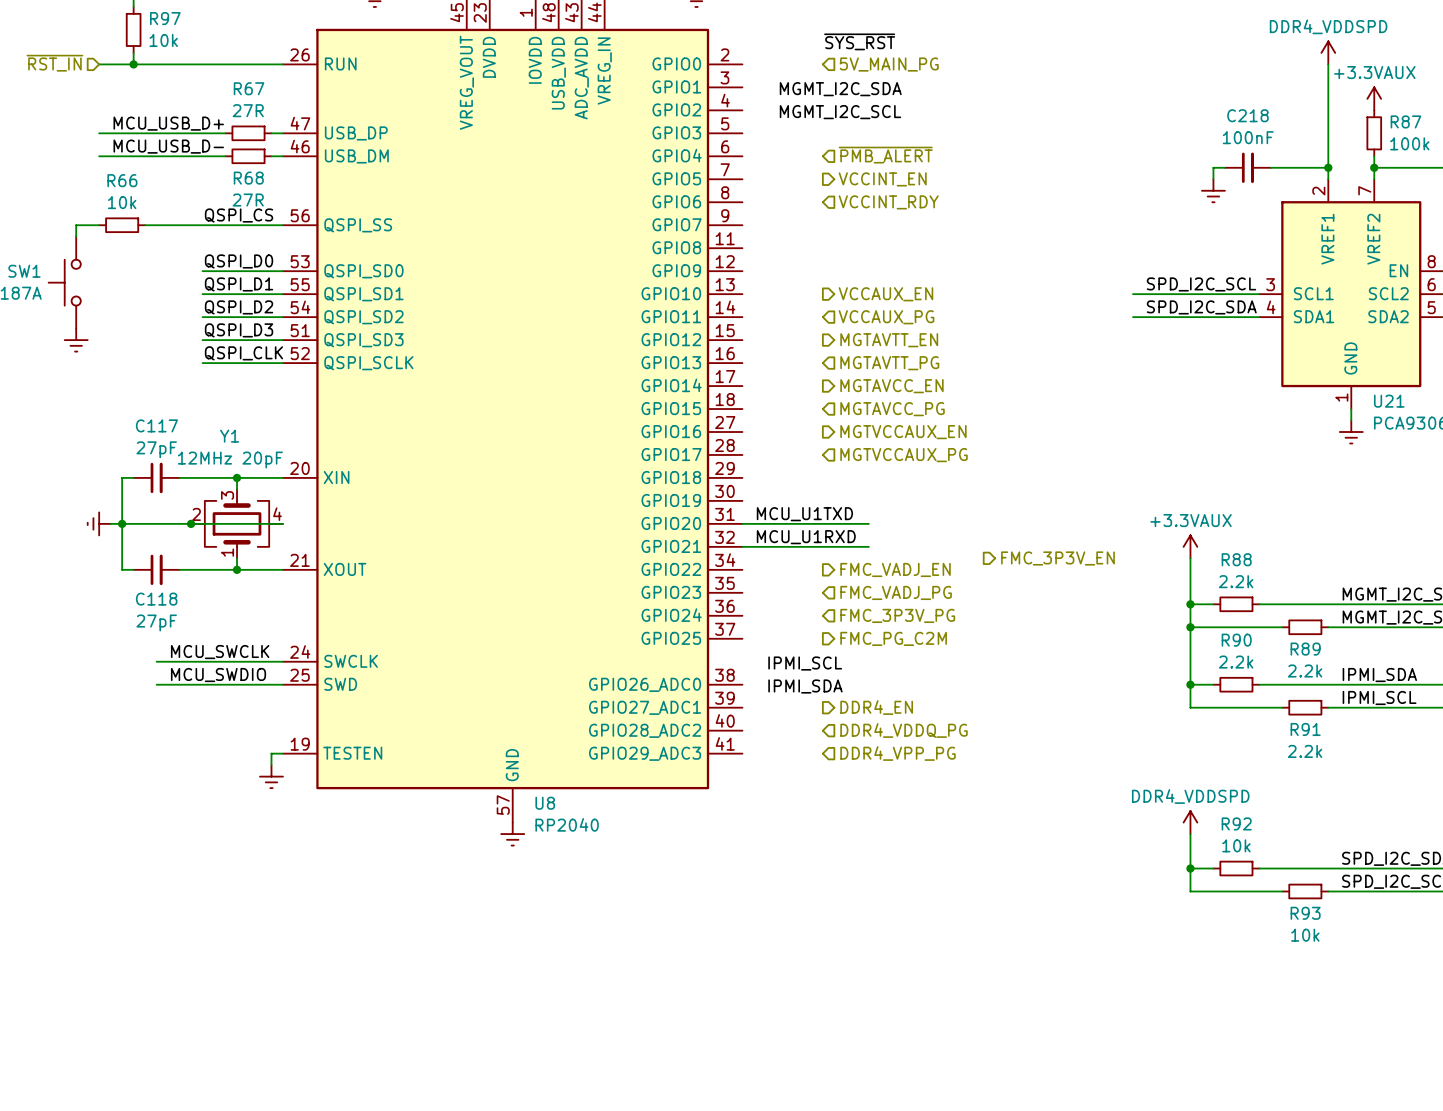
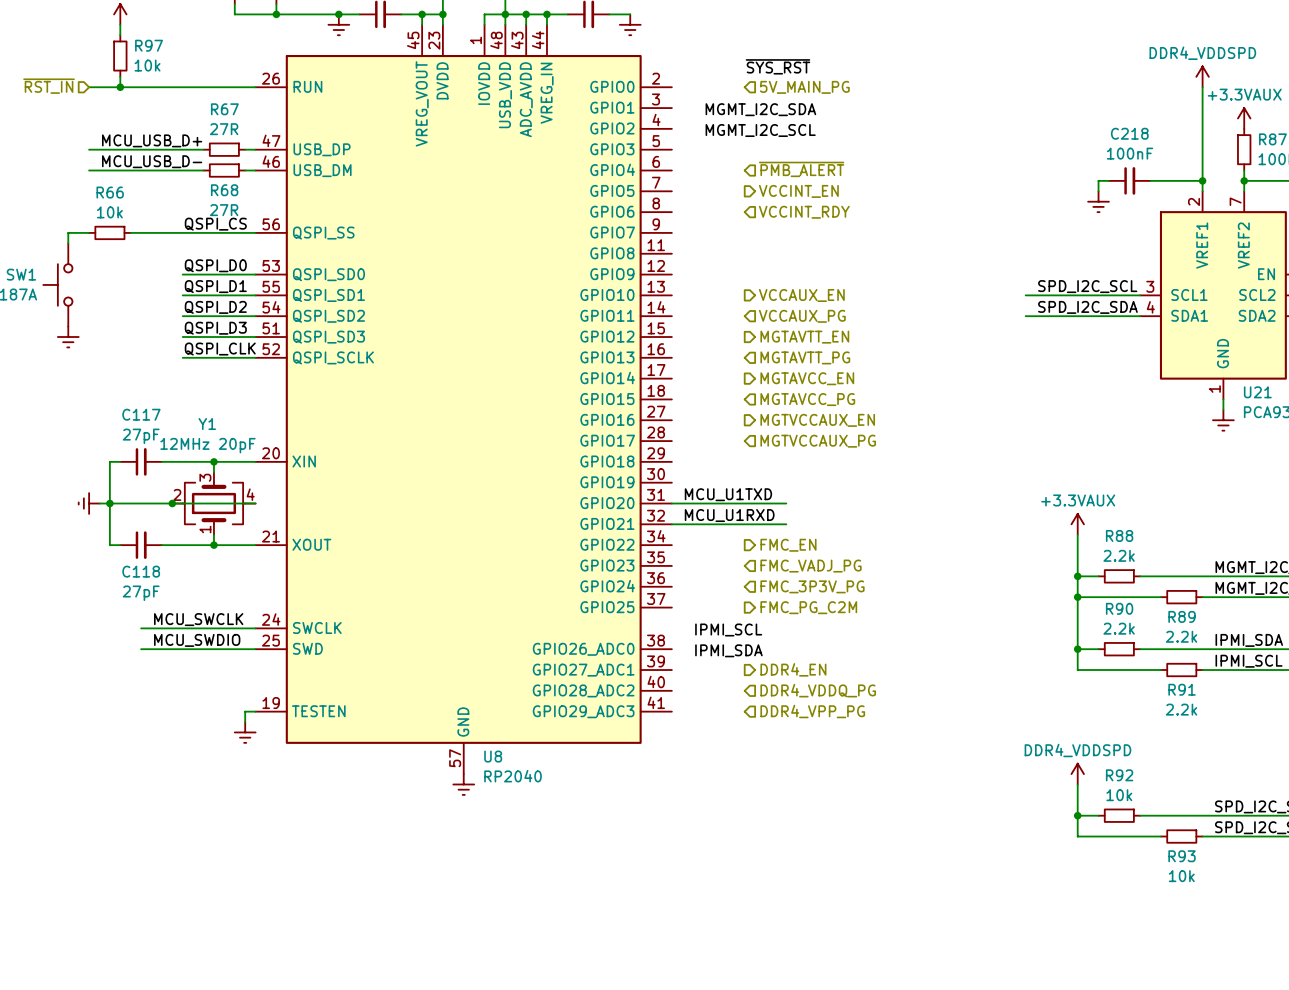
hierarchical label: FMC_3P3V_EN (1057, 558) -> none
hierarchical label: FMC_VADJ_EN (895, 569) -> FMC_EN (788, 545)

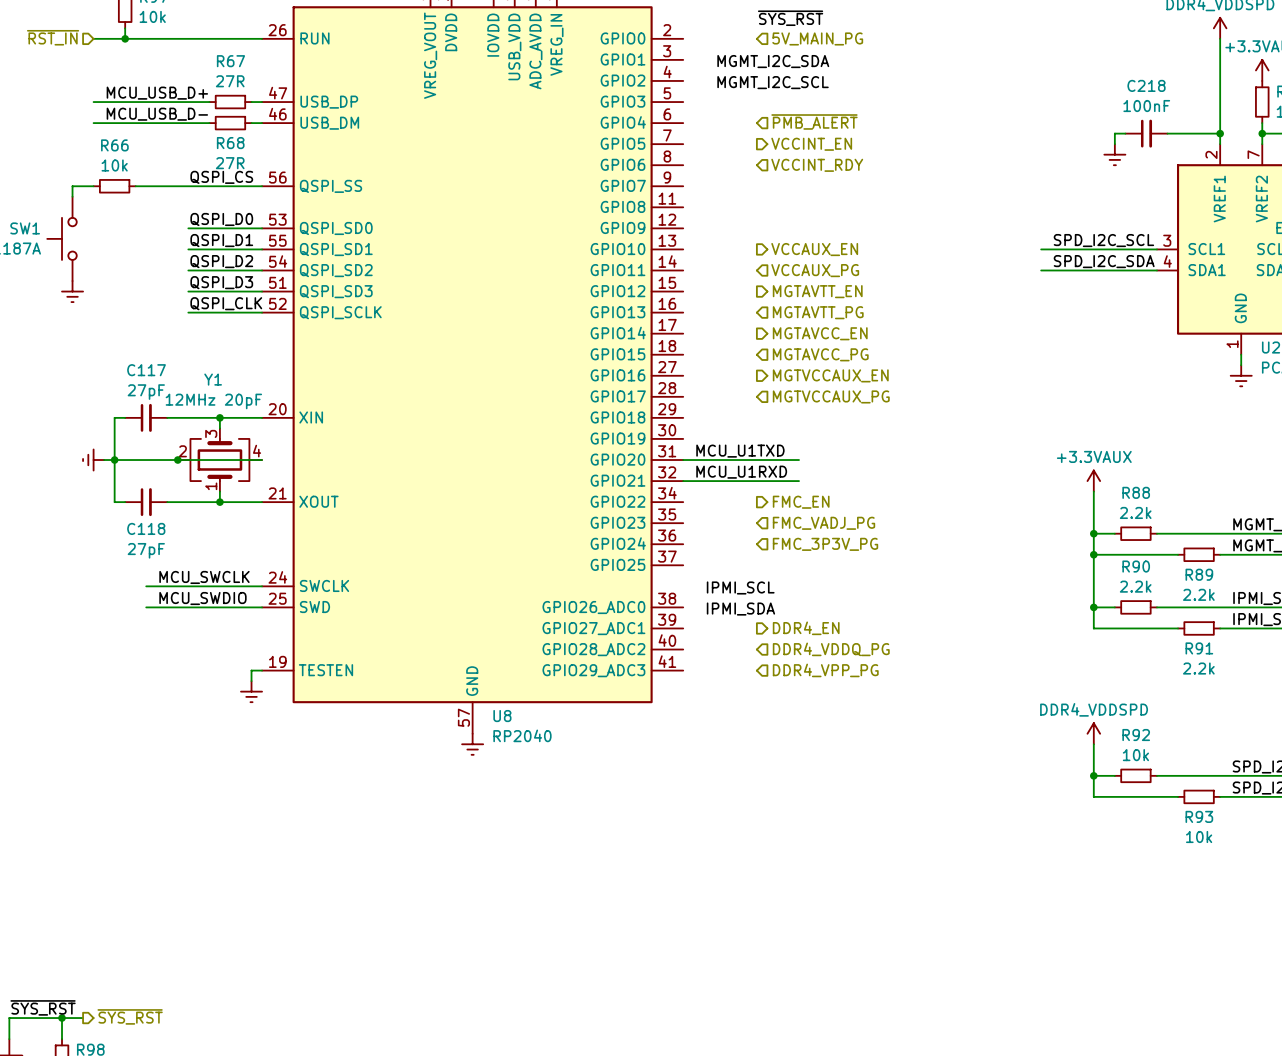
hierarchical label: FMC_PG_C2M (808, 607) -> none

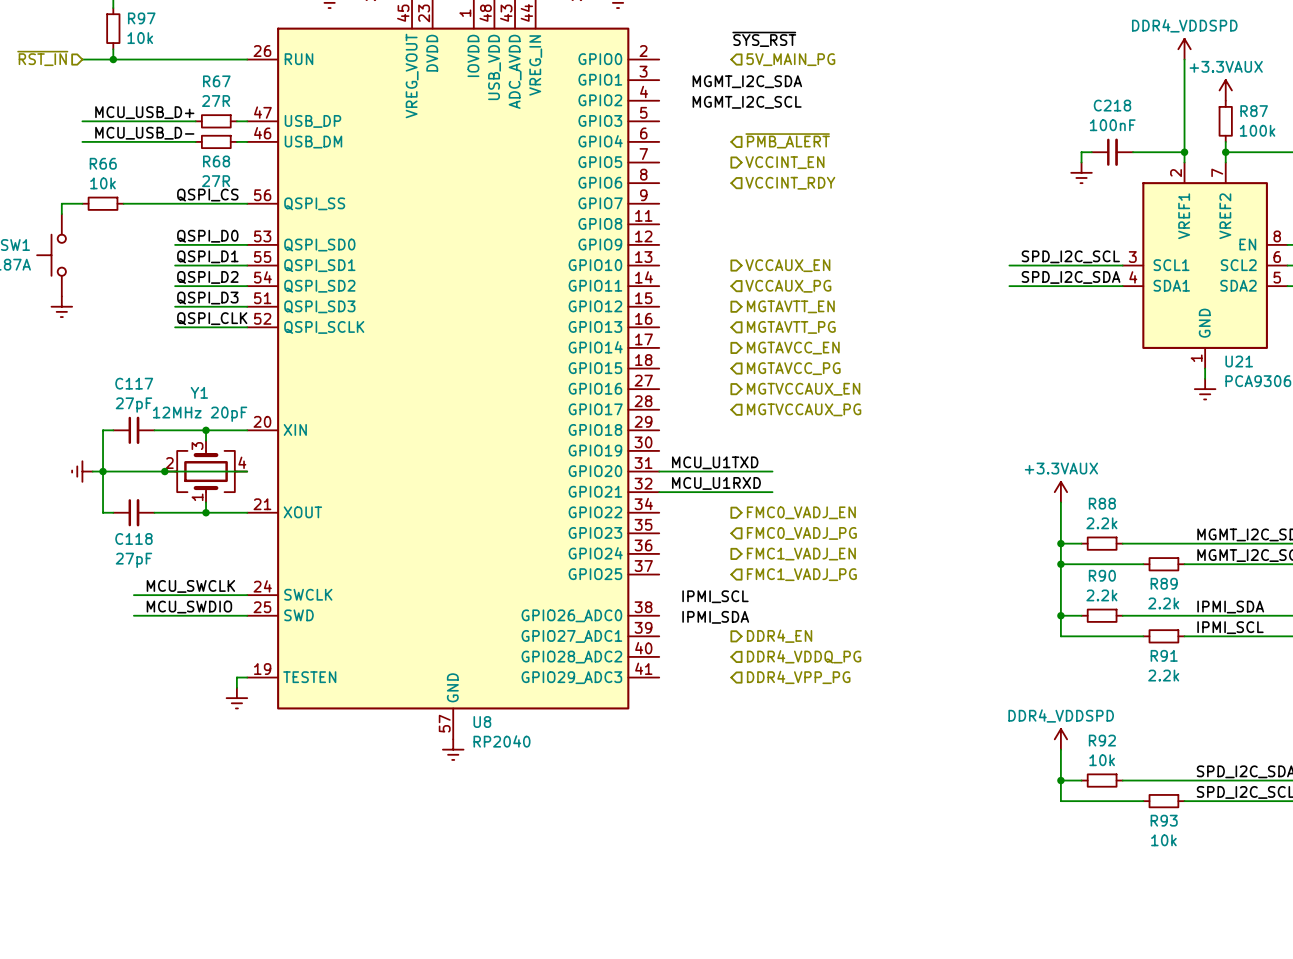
hierarchical label: FMC_EN (801, 502) -> FMC0_VADJ_EN (801, 512)
hierarchical label: FMC_VADJ_PG (823, 523) -> FMC0_VADJ_PG (801, 533)
hierarchical label shape: input (825, 544) -> output (801, 554)
hierarchical label: FMC_3P3V_PG (825, 544) -> FMC1_VADJ_EN (801, 554)
hierarchical label: none -> FMC1_VADJ_PG (801, 574)

